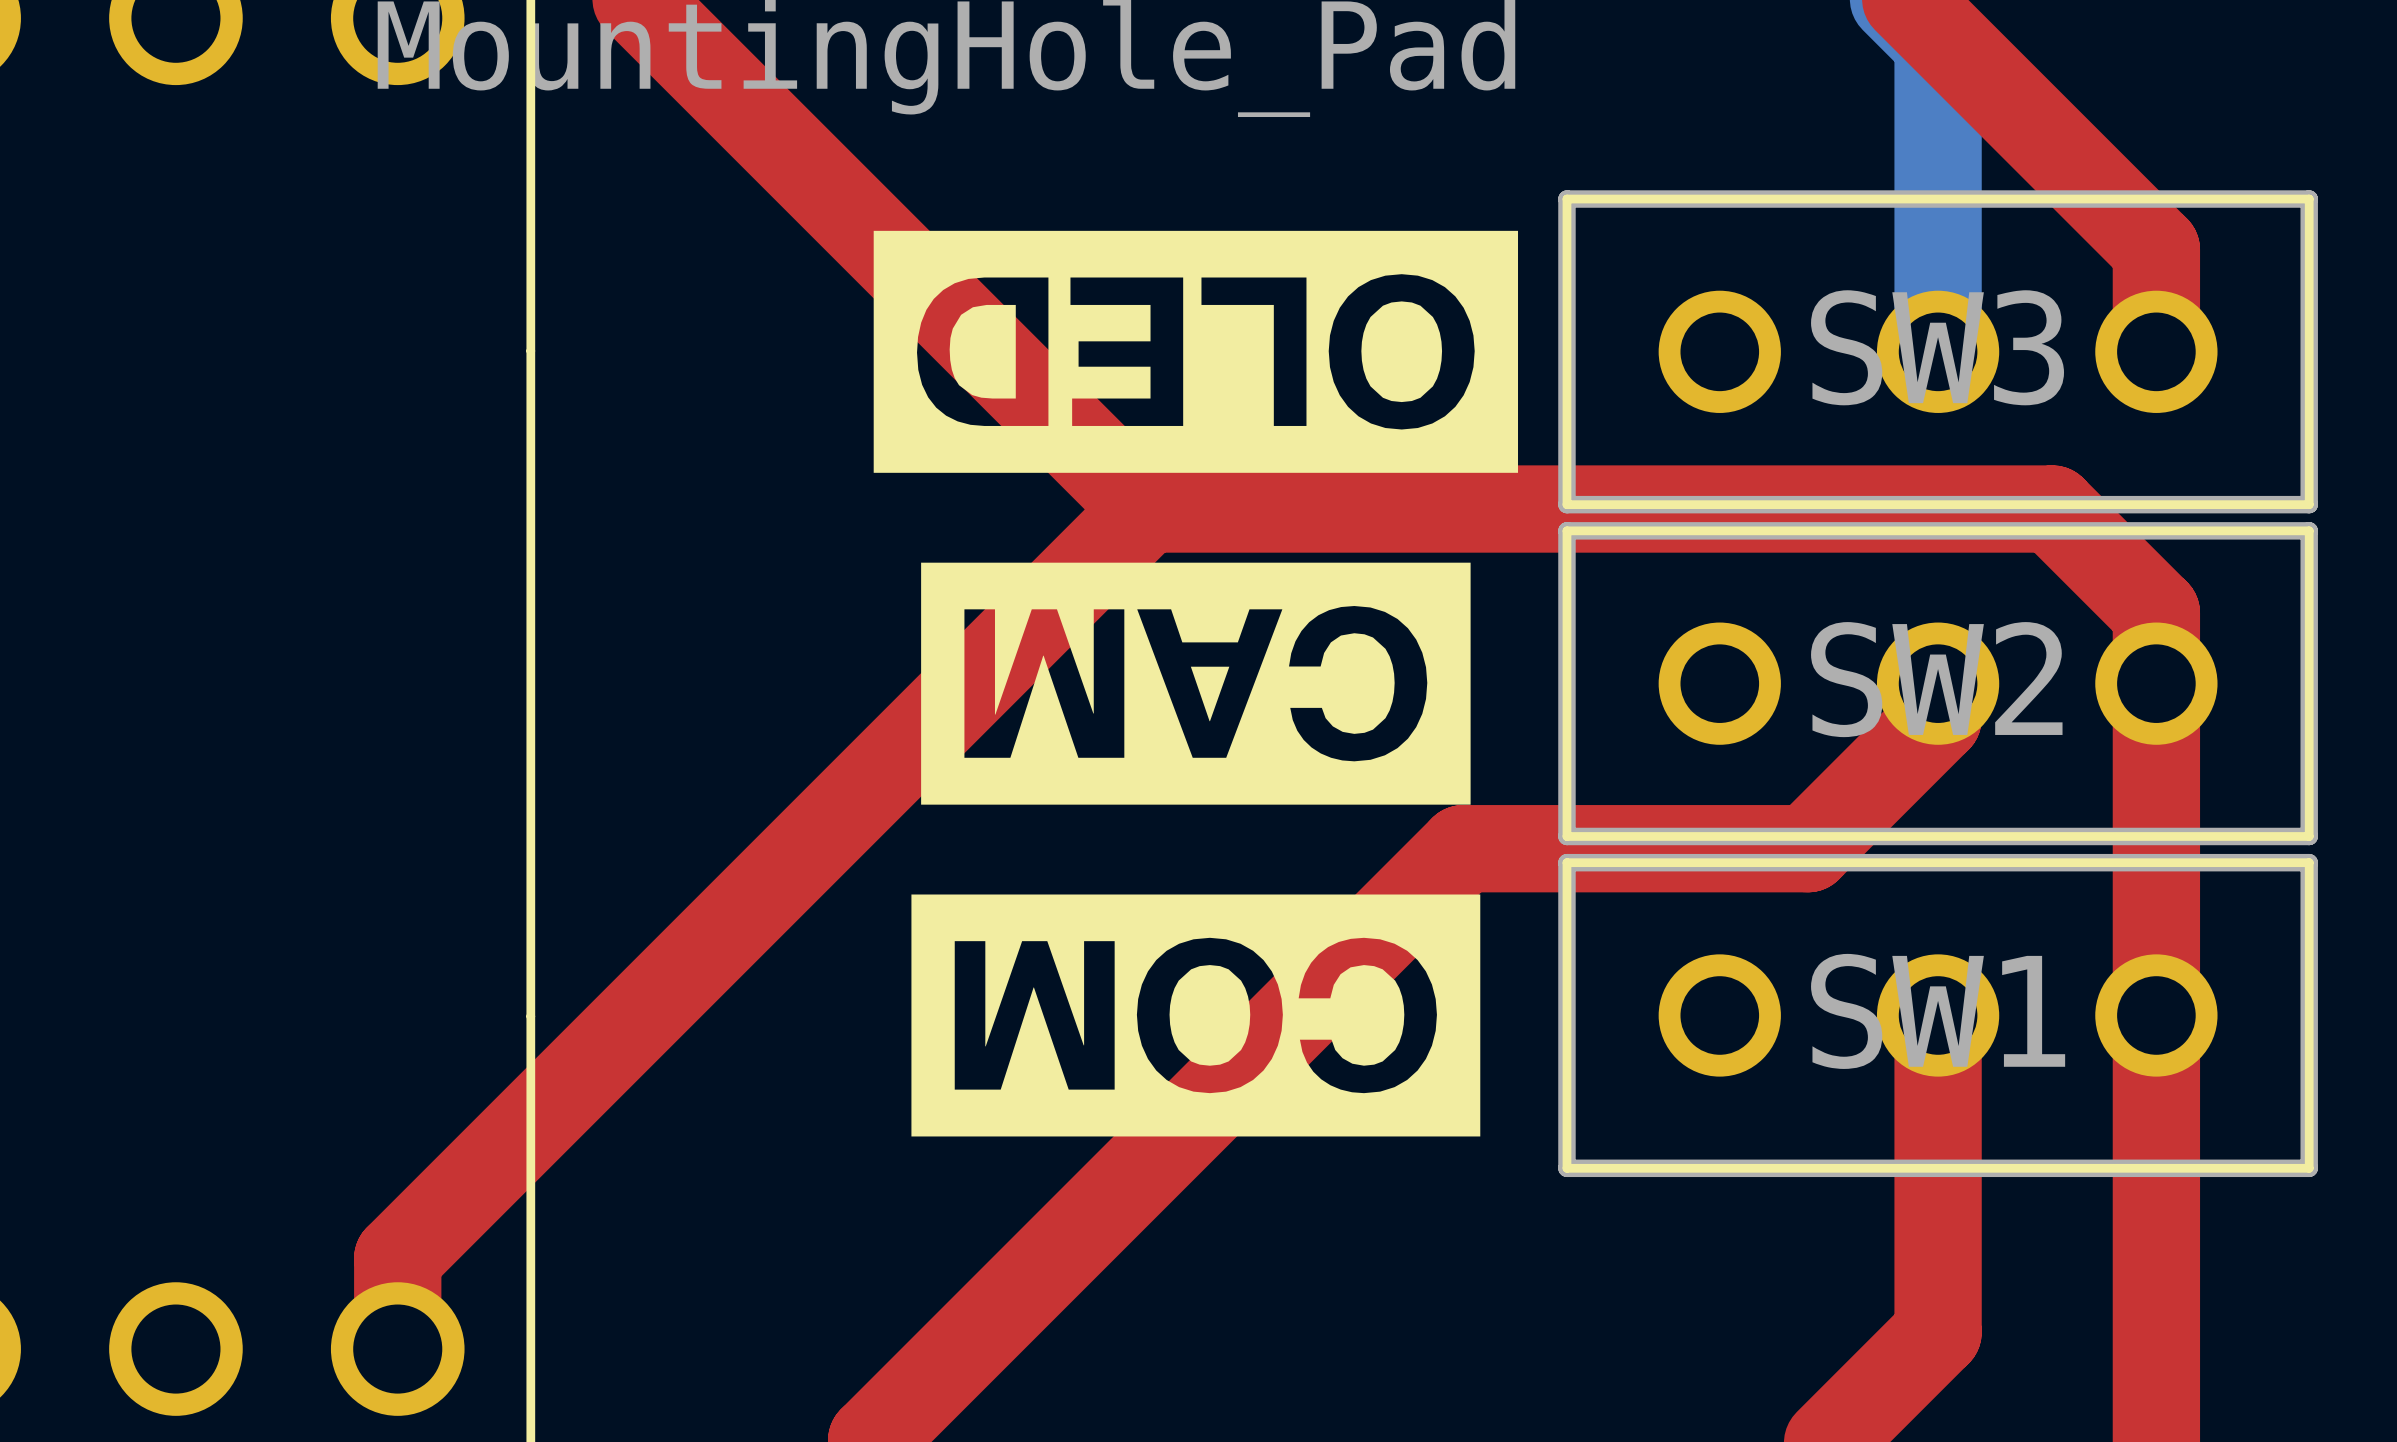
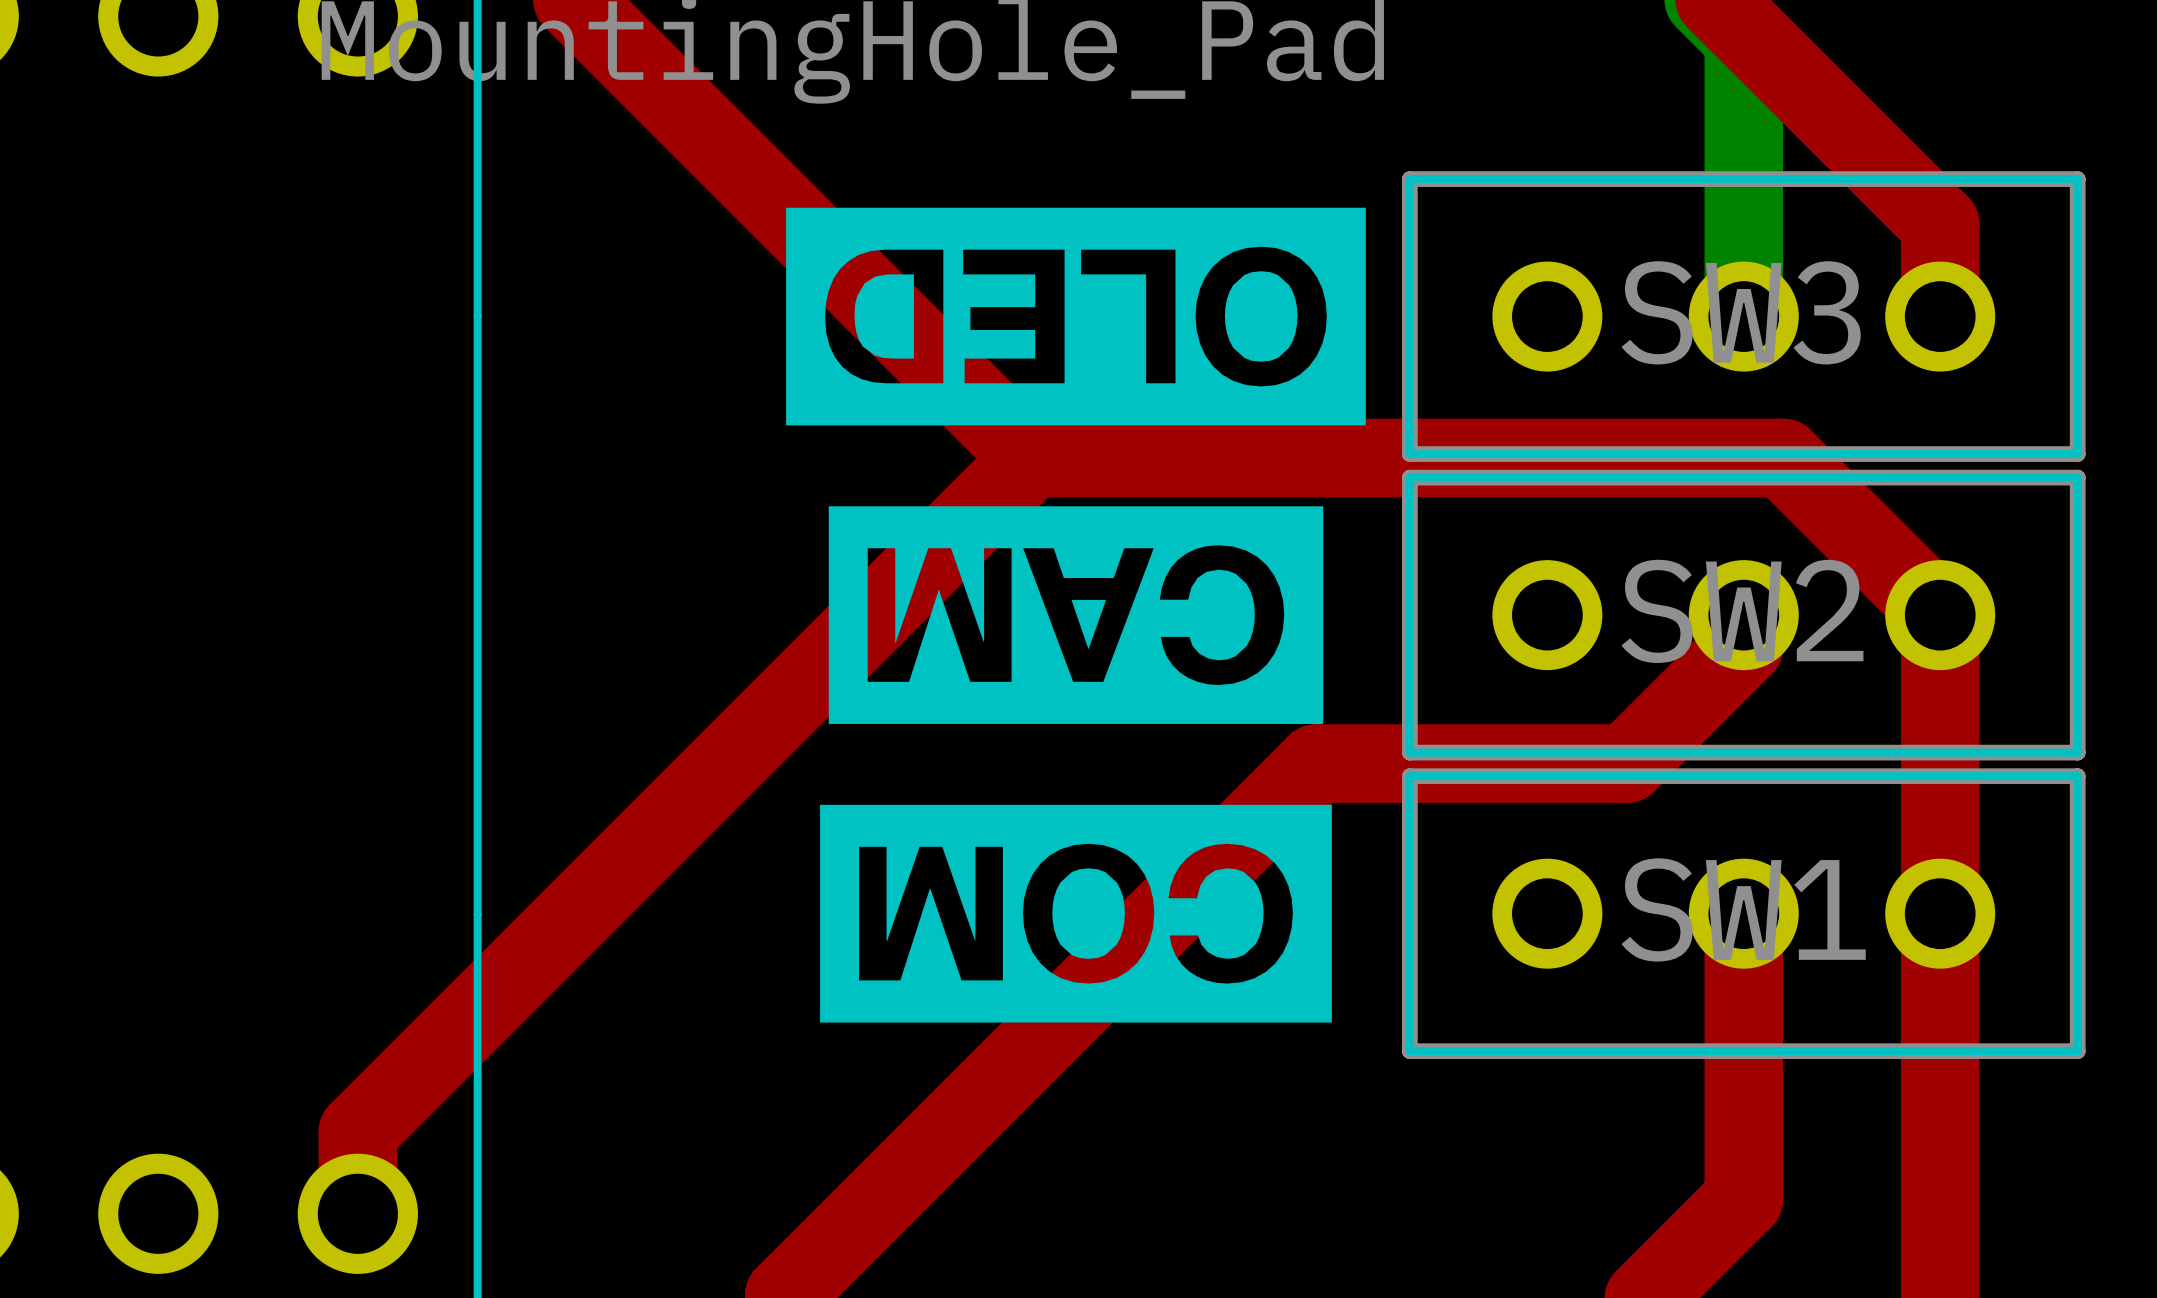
top track: (1981, 509) (2052, 509) (2156, 612) (2156, 683) -> (1783, 457) (1940, 615)

